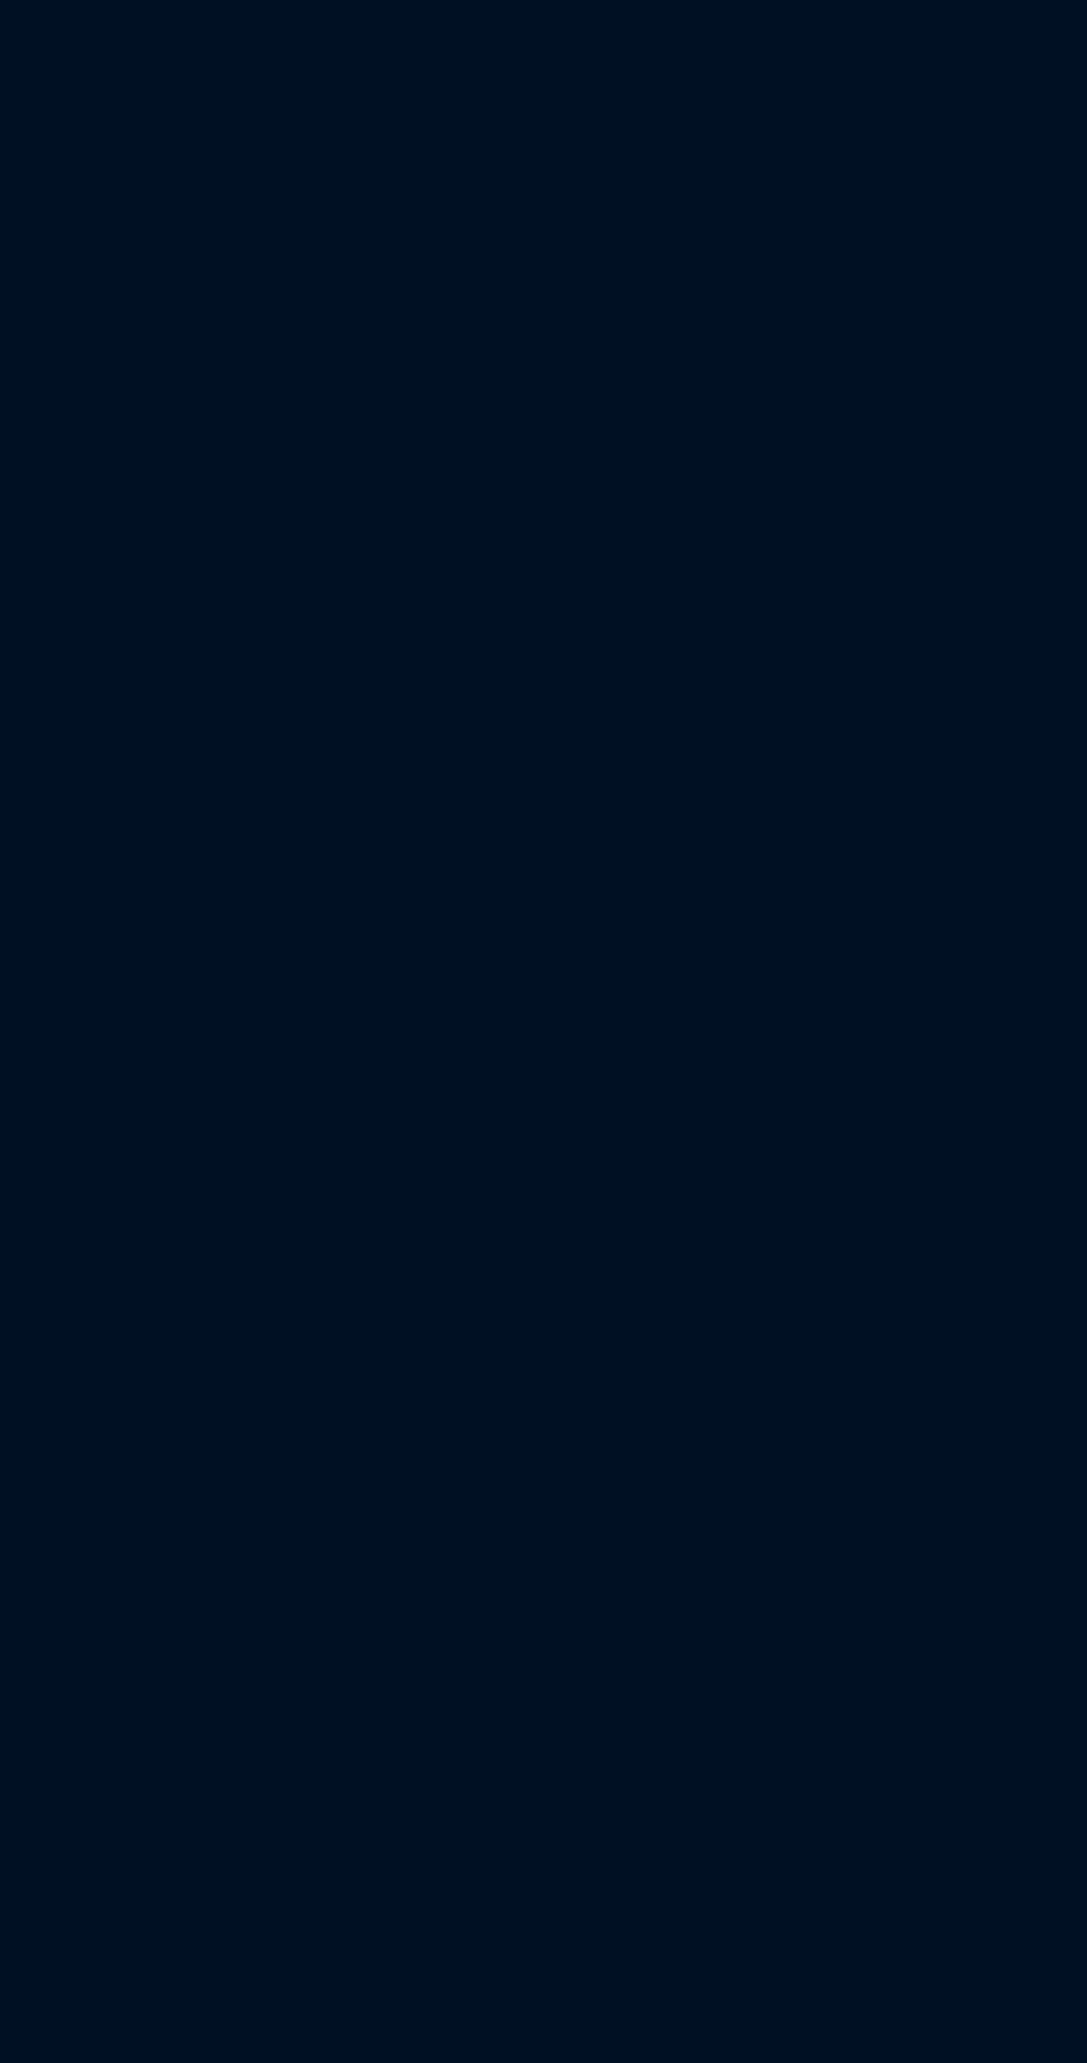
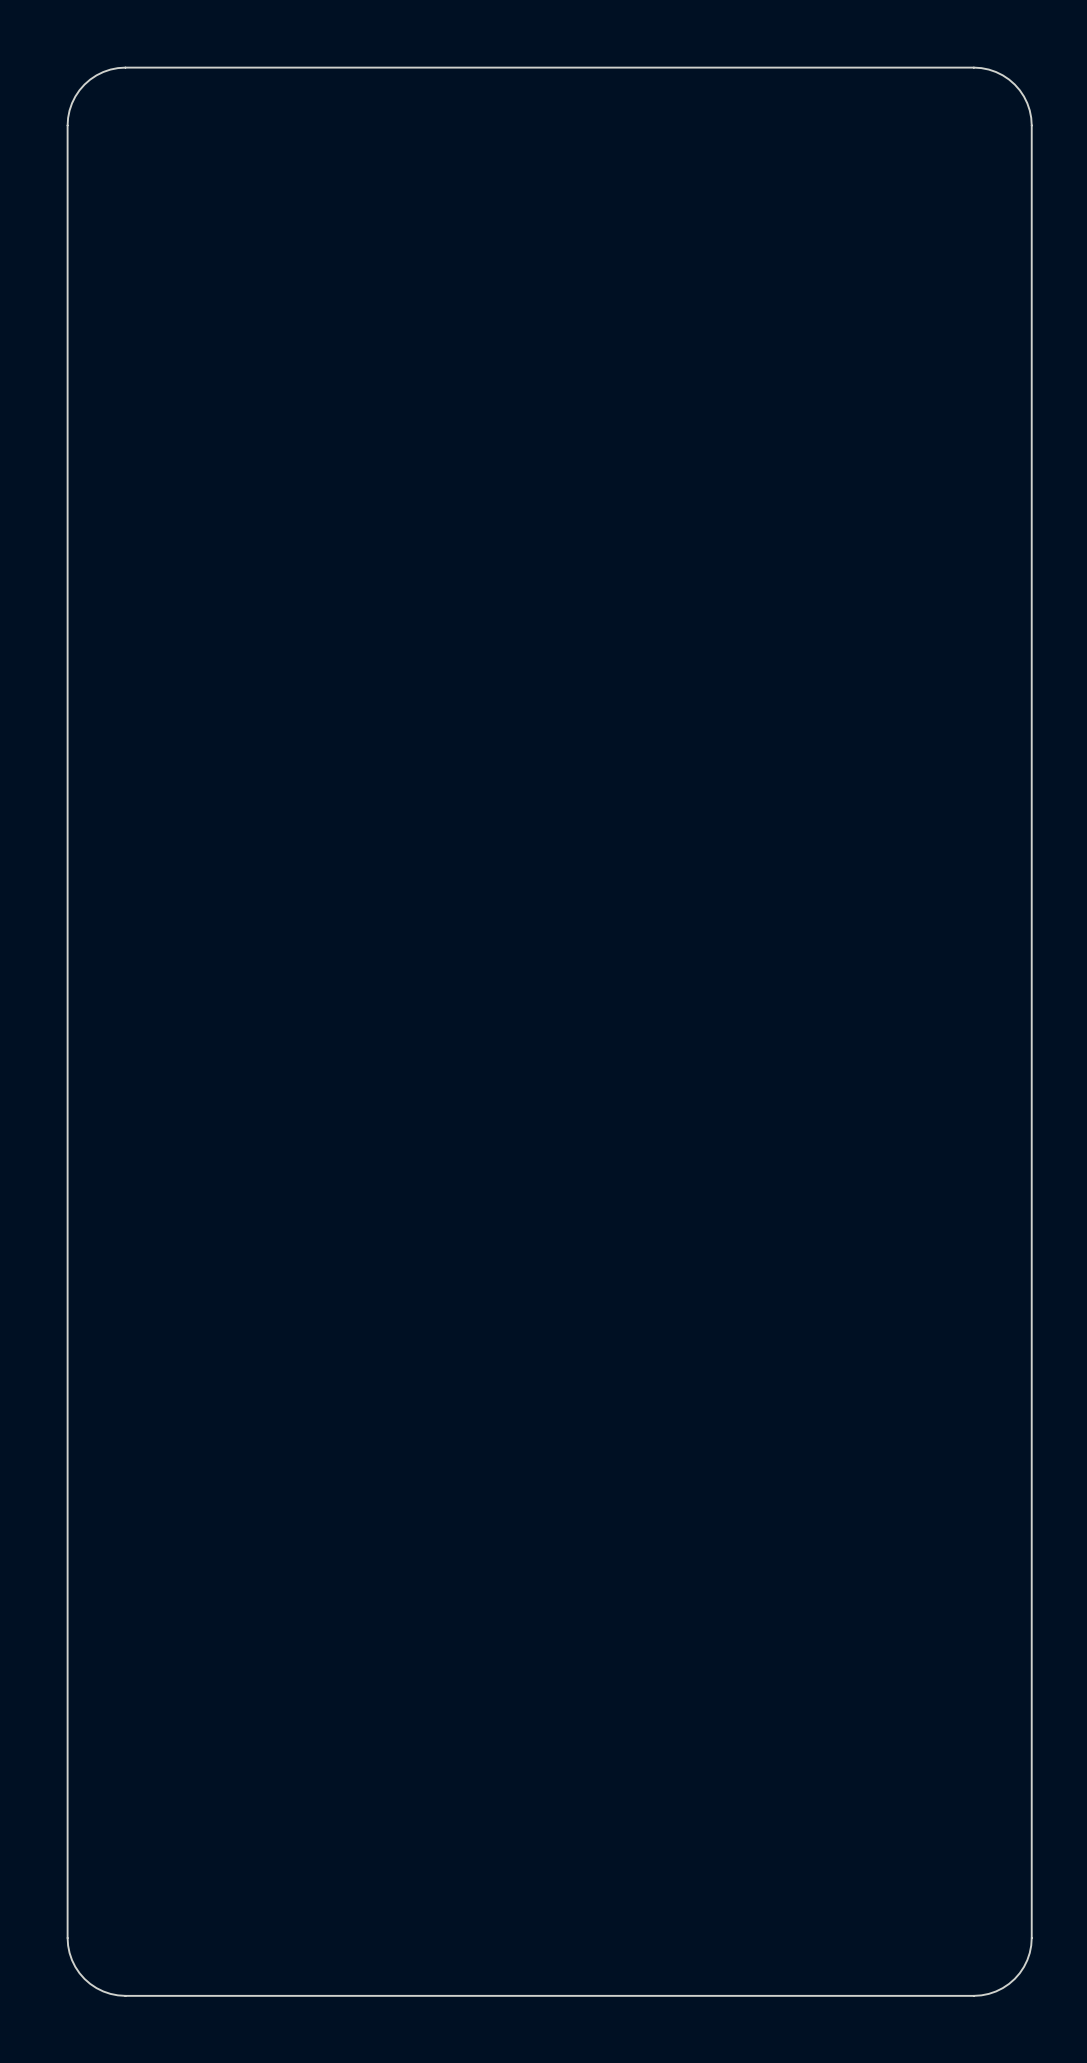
drawing: none -> [67, 67, 1033, 1997]

